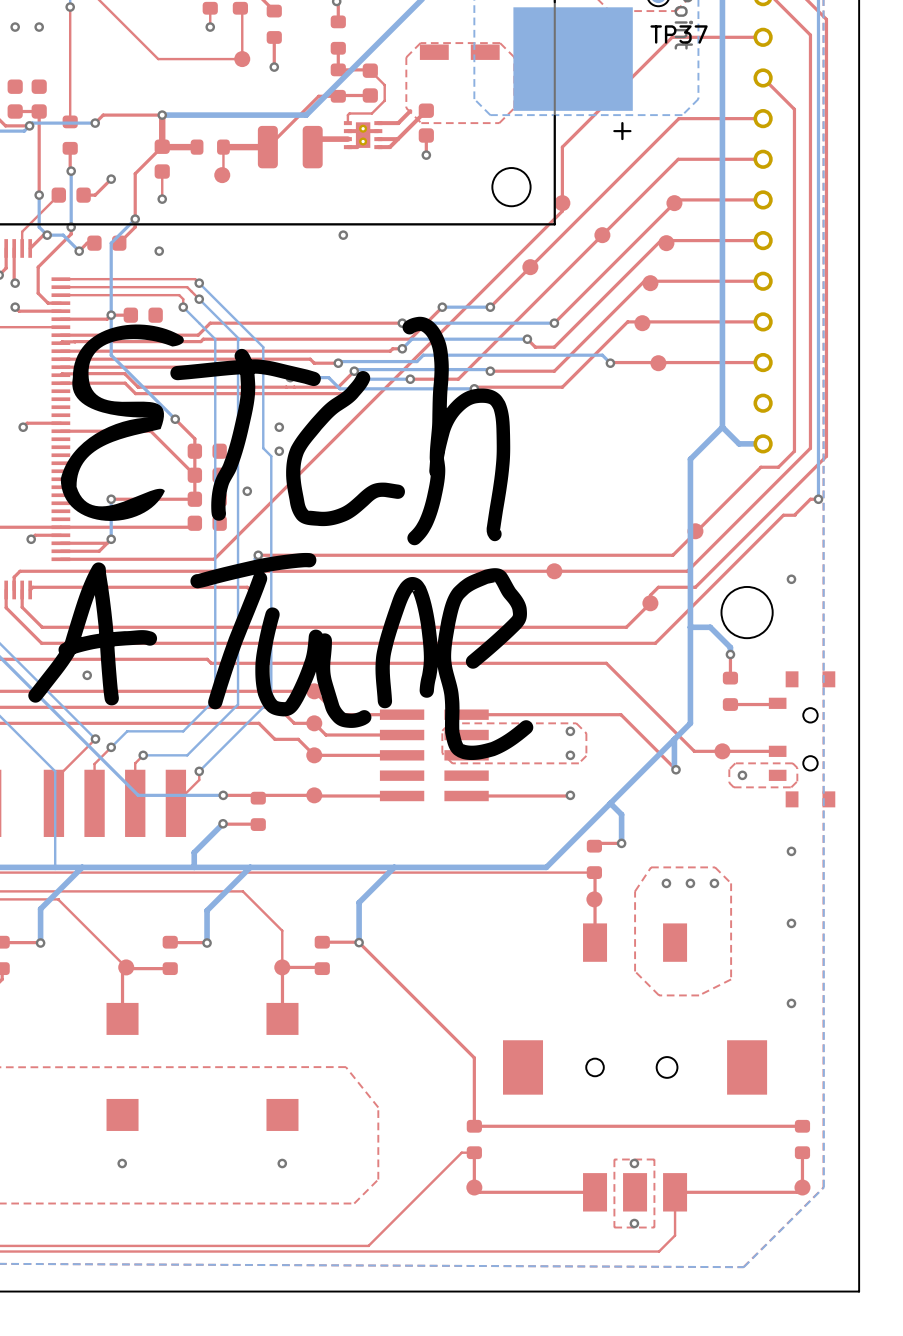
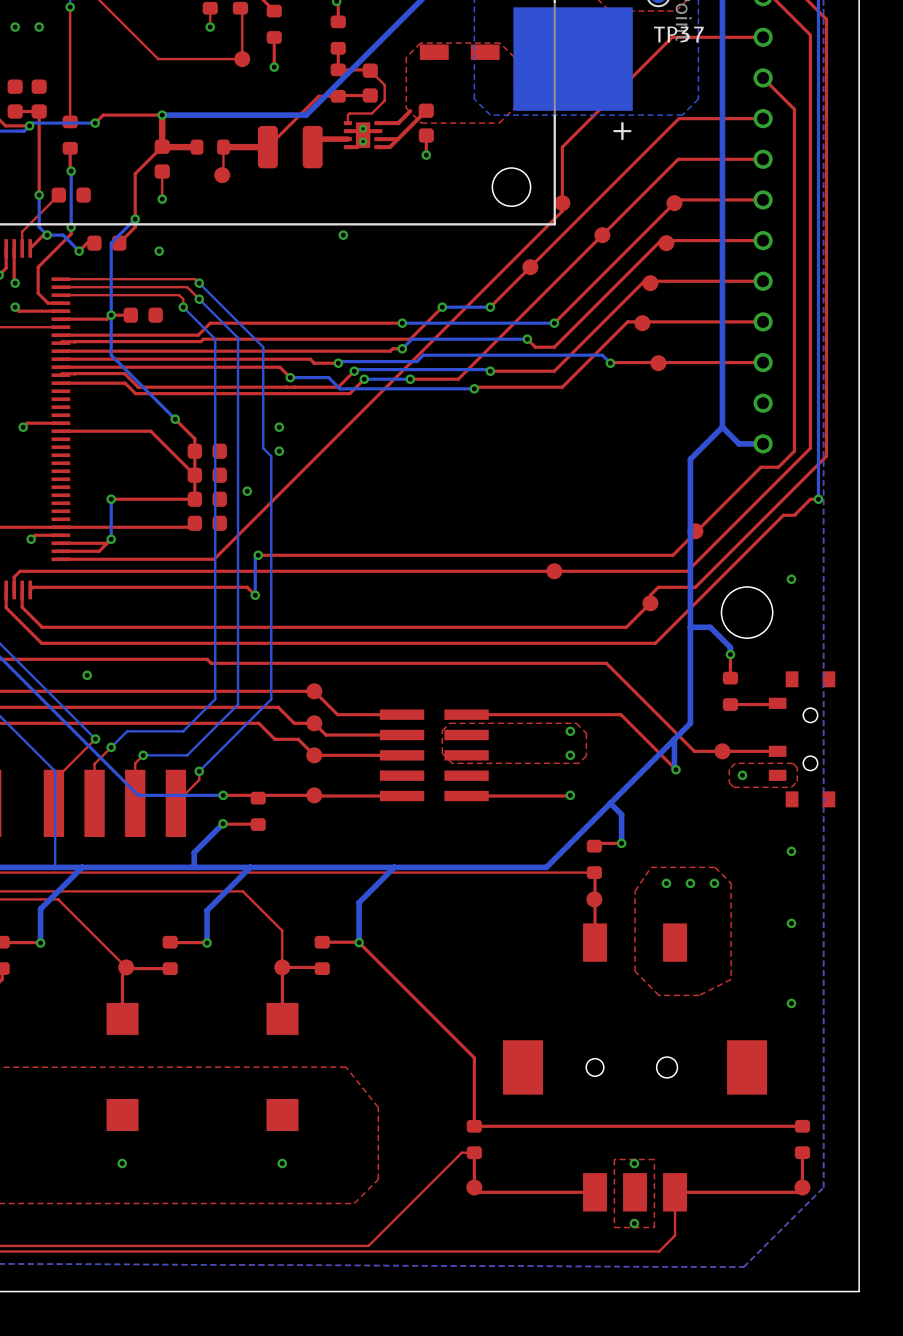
top track: (111, 179) (95, 195) (83, 195) -> none
via: (111, 179) -> none
drawing: [60, 316, 511, 546] -> none
drawing: [190, 552, 534, 761] -> none
drawing: [28, 562, 158, 706] -> none

